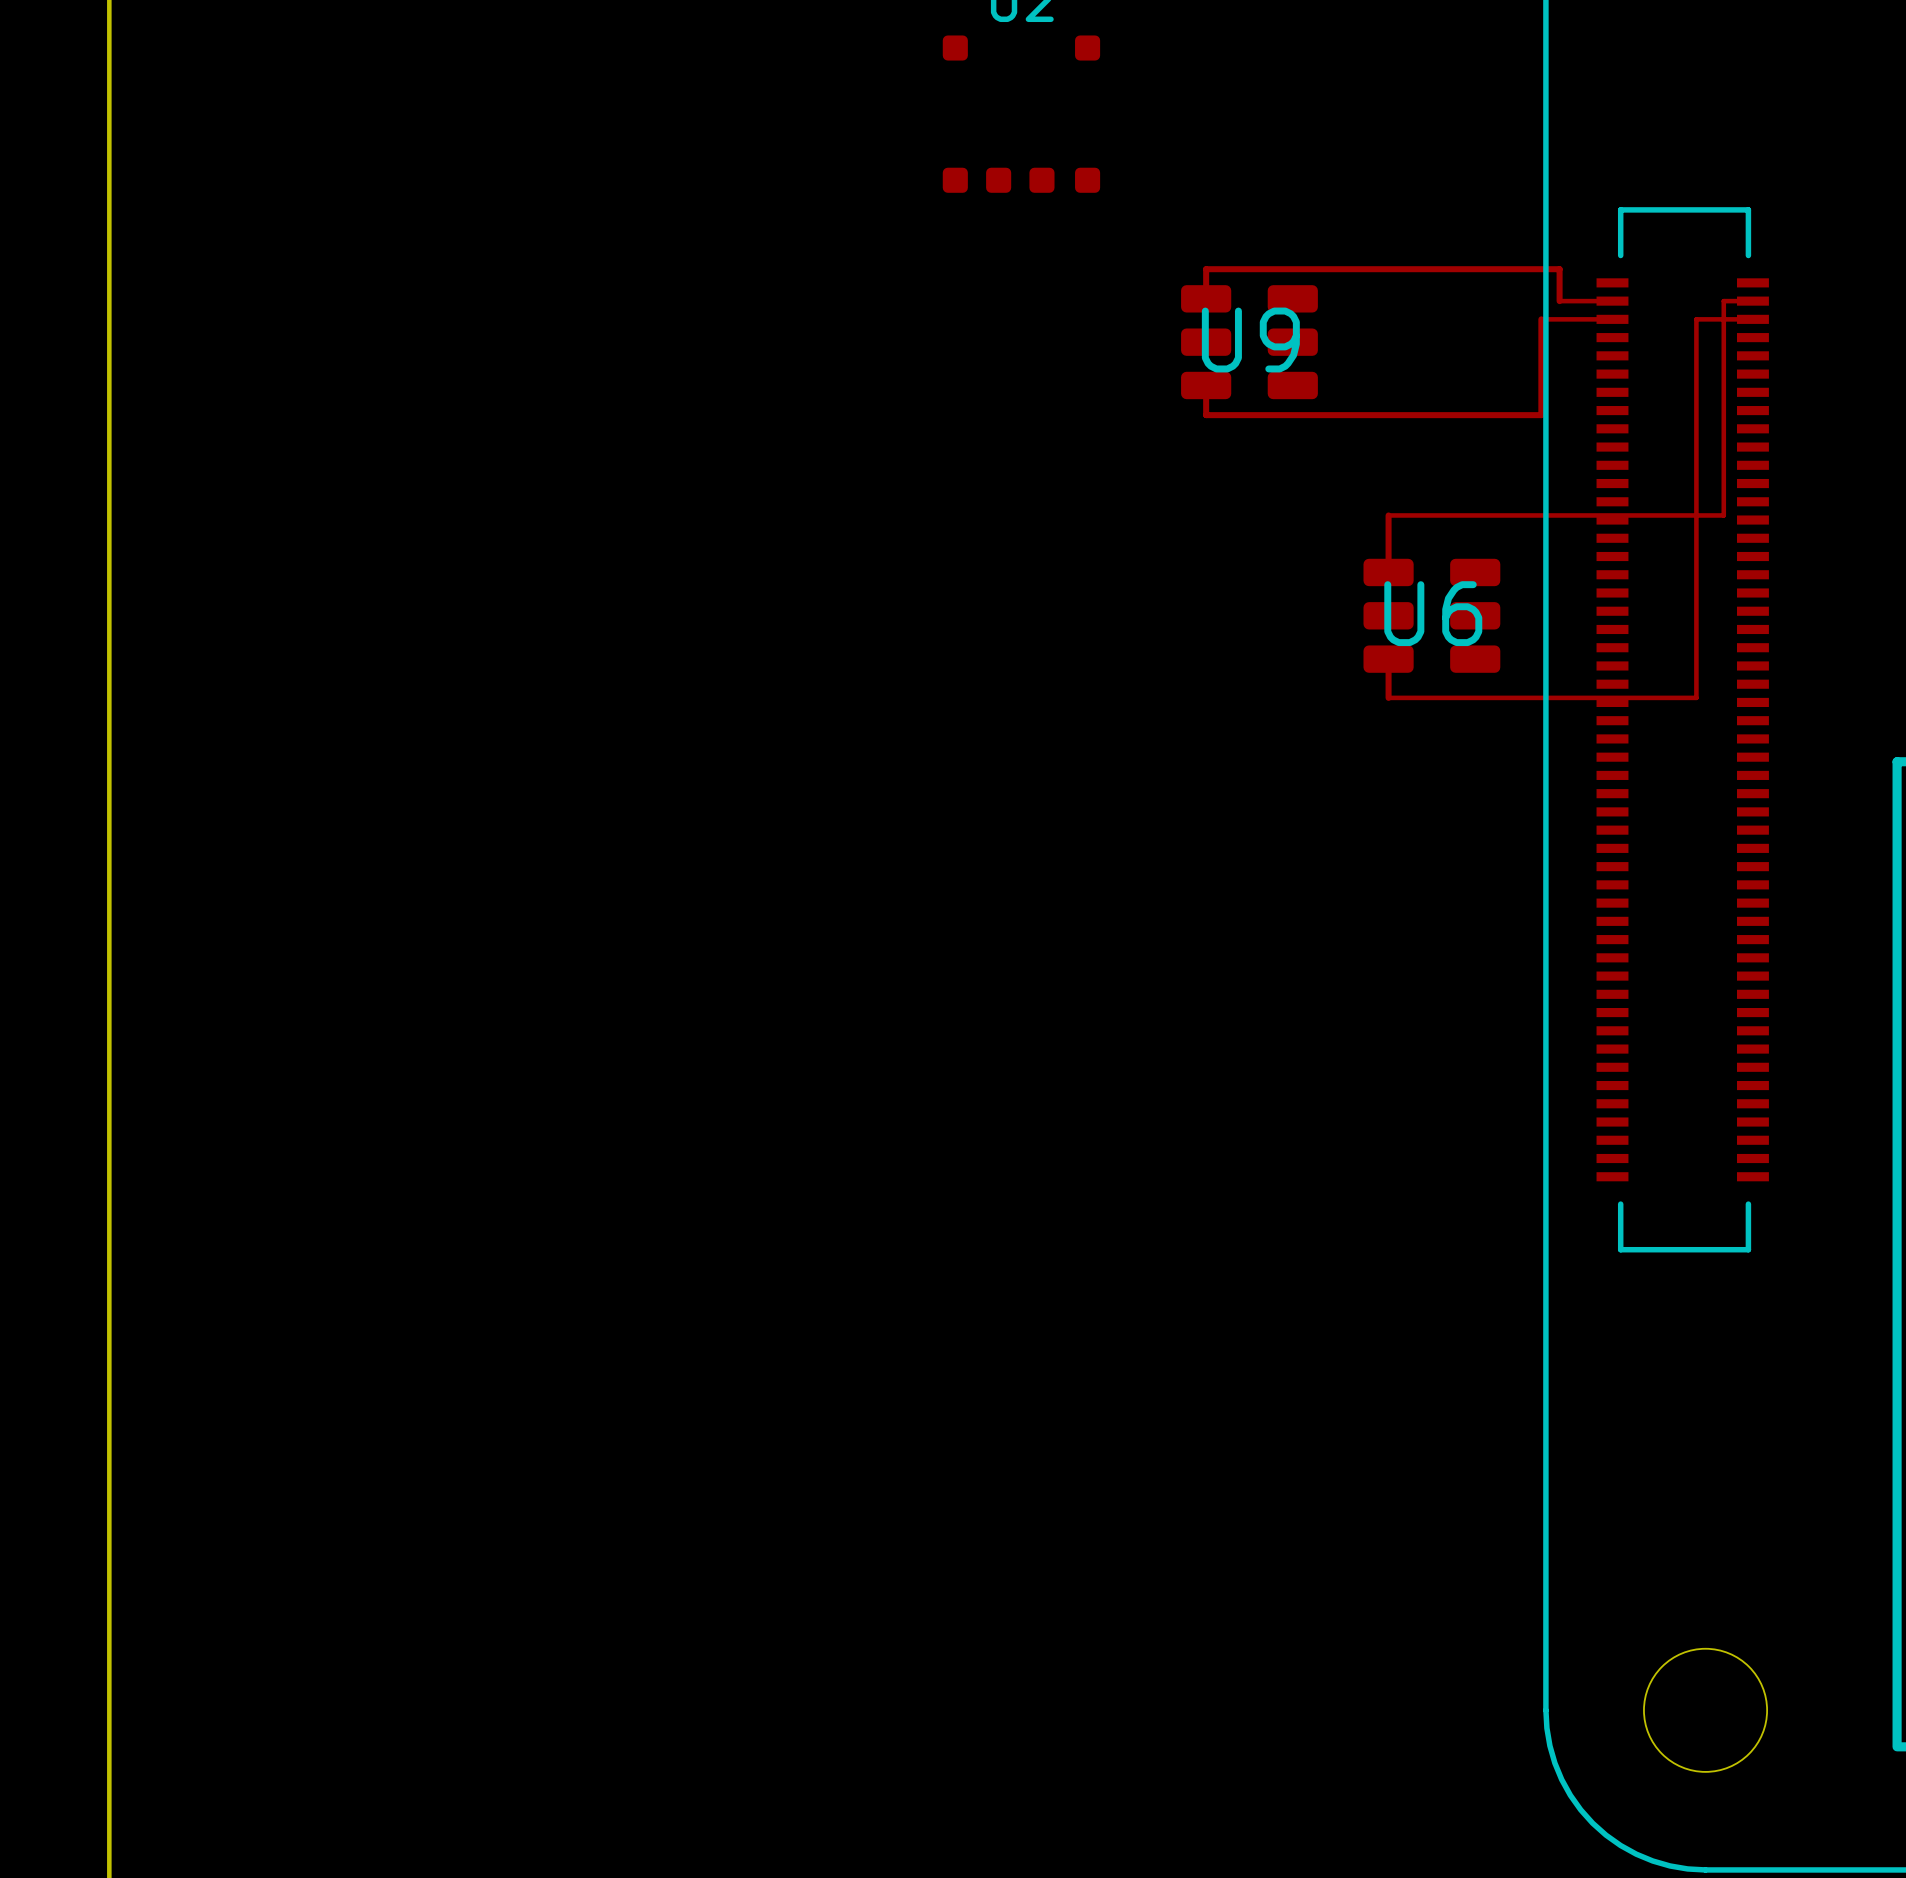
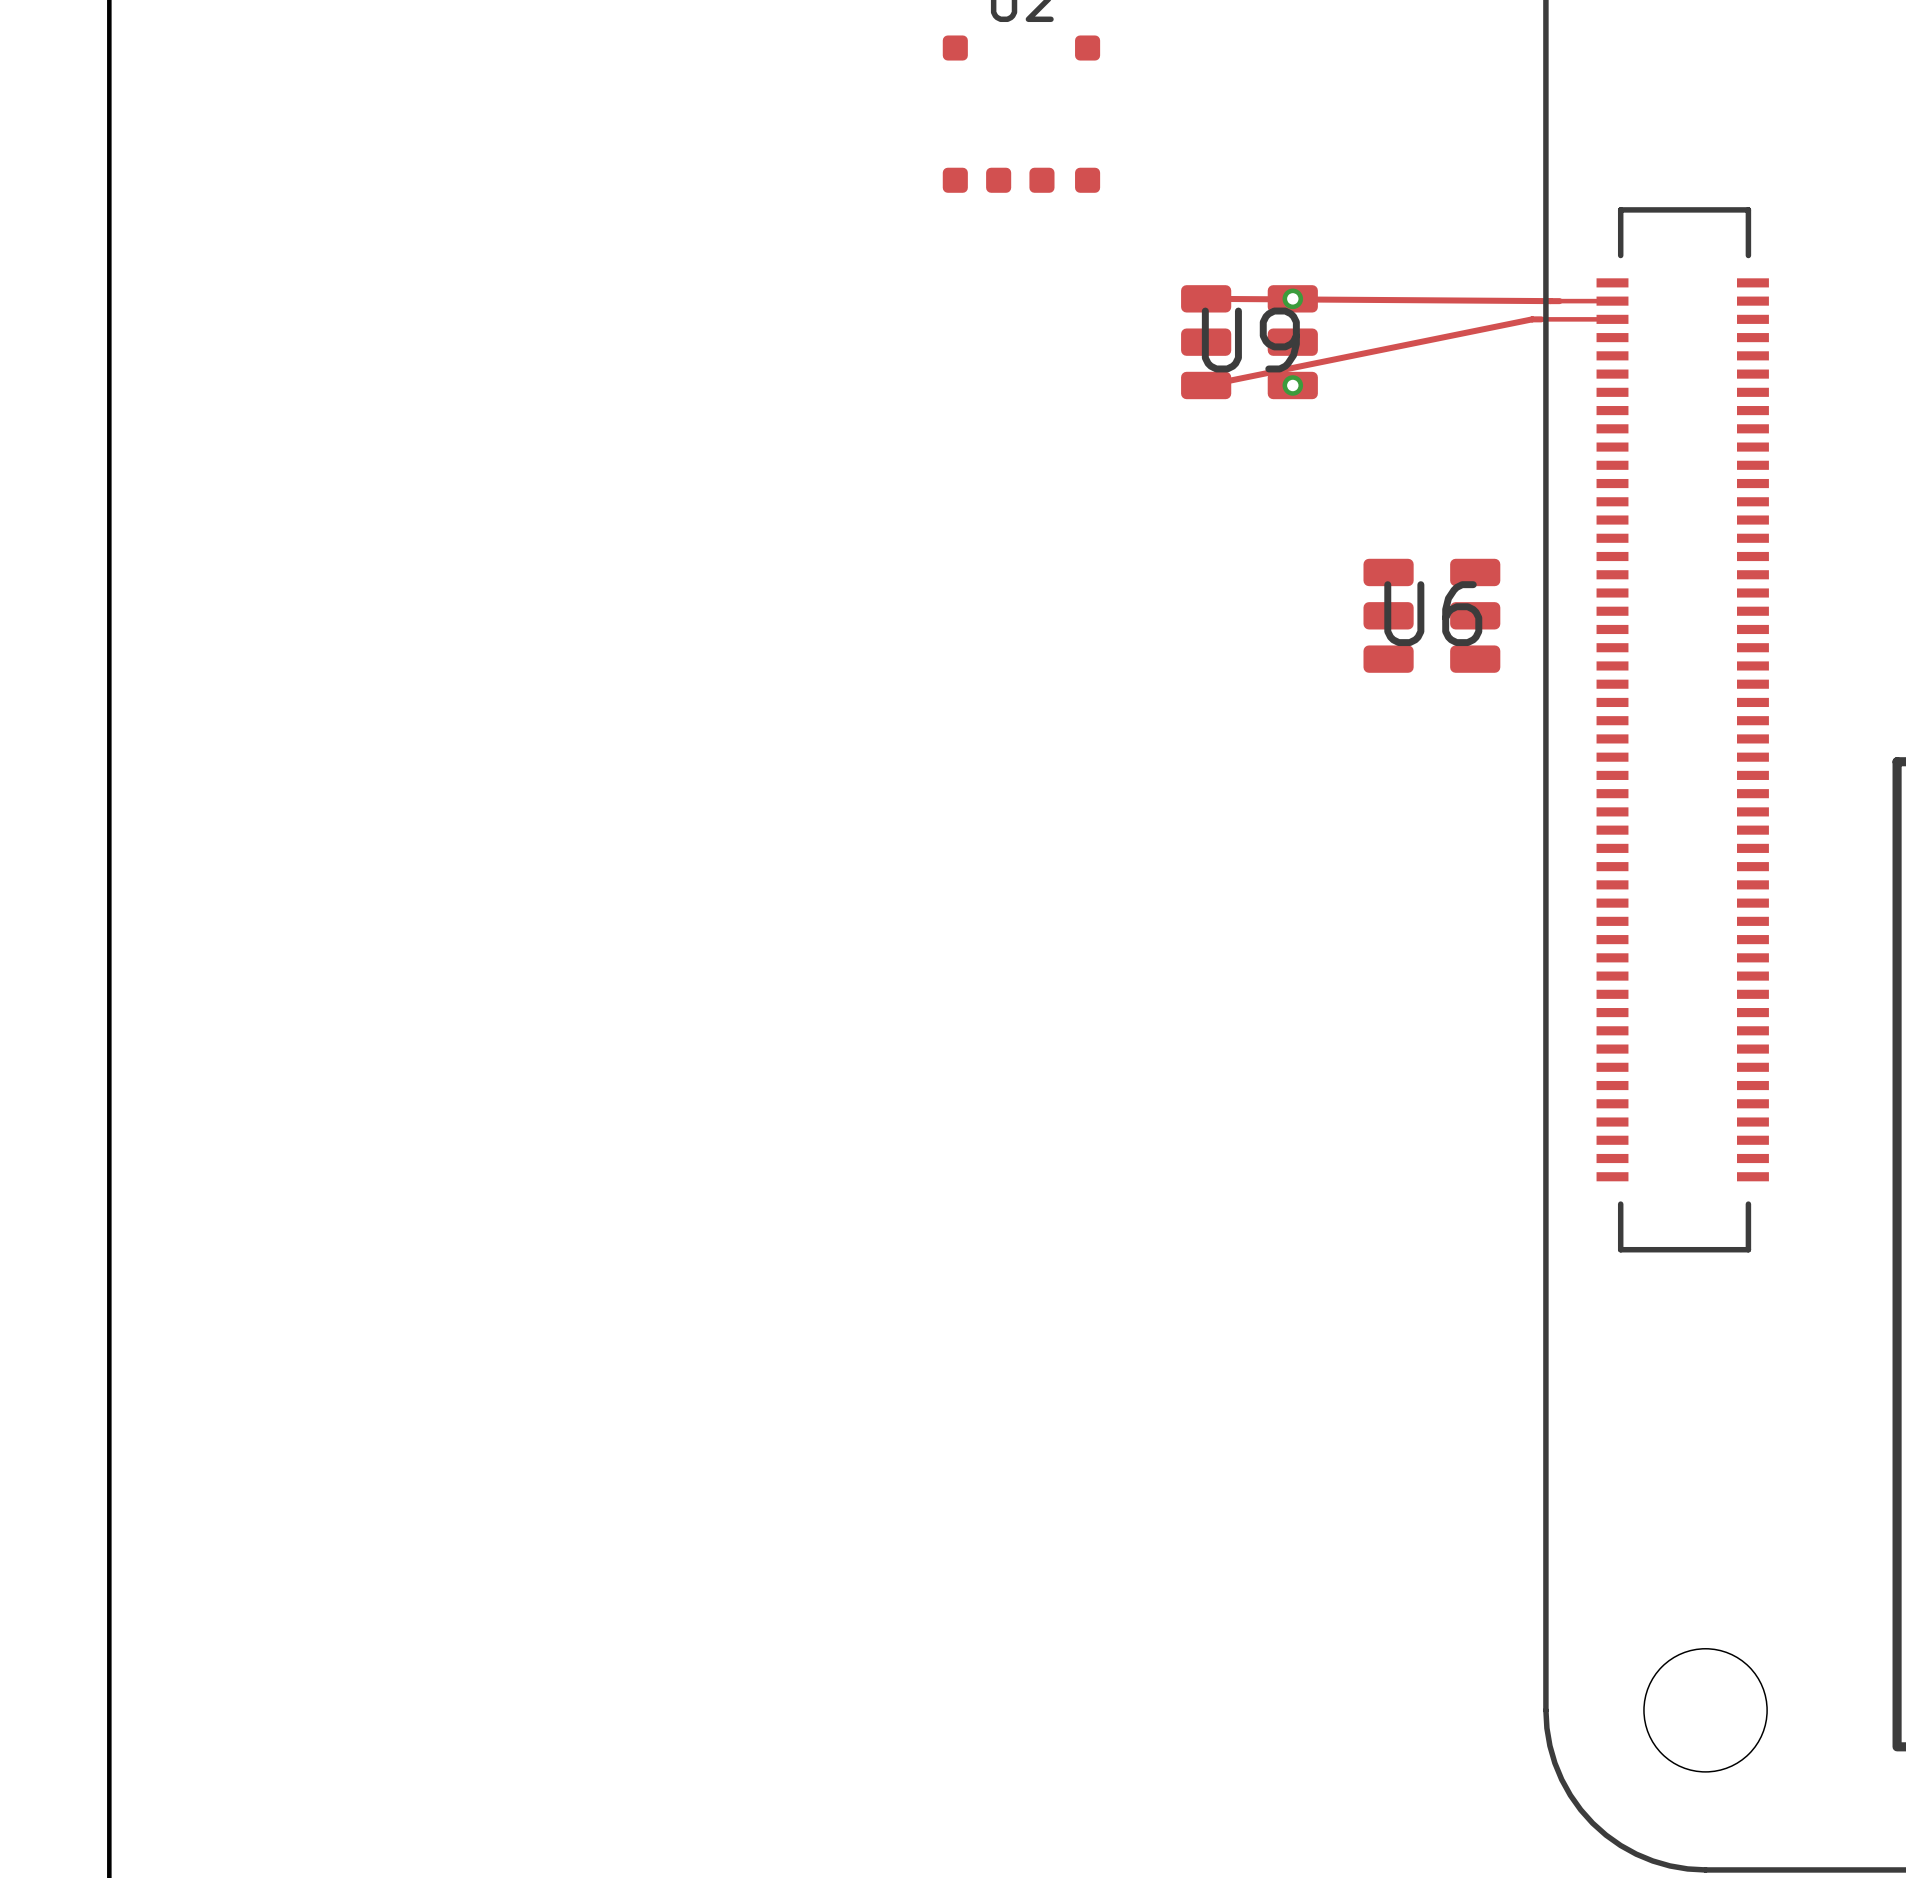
track: (1206, 298) (1206, 269) (1559, 269) (1559, 301) -> (1206, 298) (1559, 301)
via: none -> (1292, 298)
track: (1752, 301) (1723, 301) (1723, 515) (1388, 515) (1388, 572) -> none
track: (1541, 319) (1541, 415) (1206, 415) (1206, 385) -> (1541, 319) (1532, 319) (1206, 385)
track: (1752, 319) (1696, 319) (1696, 697) (1388, 697) (1388, 659) -> none
via: none -> (1292, 385)

